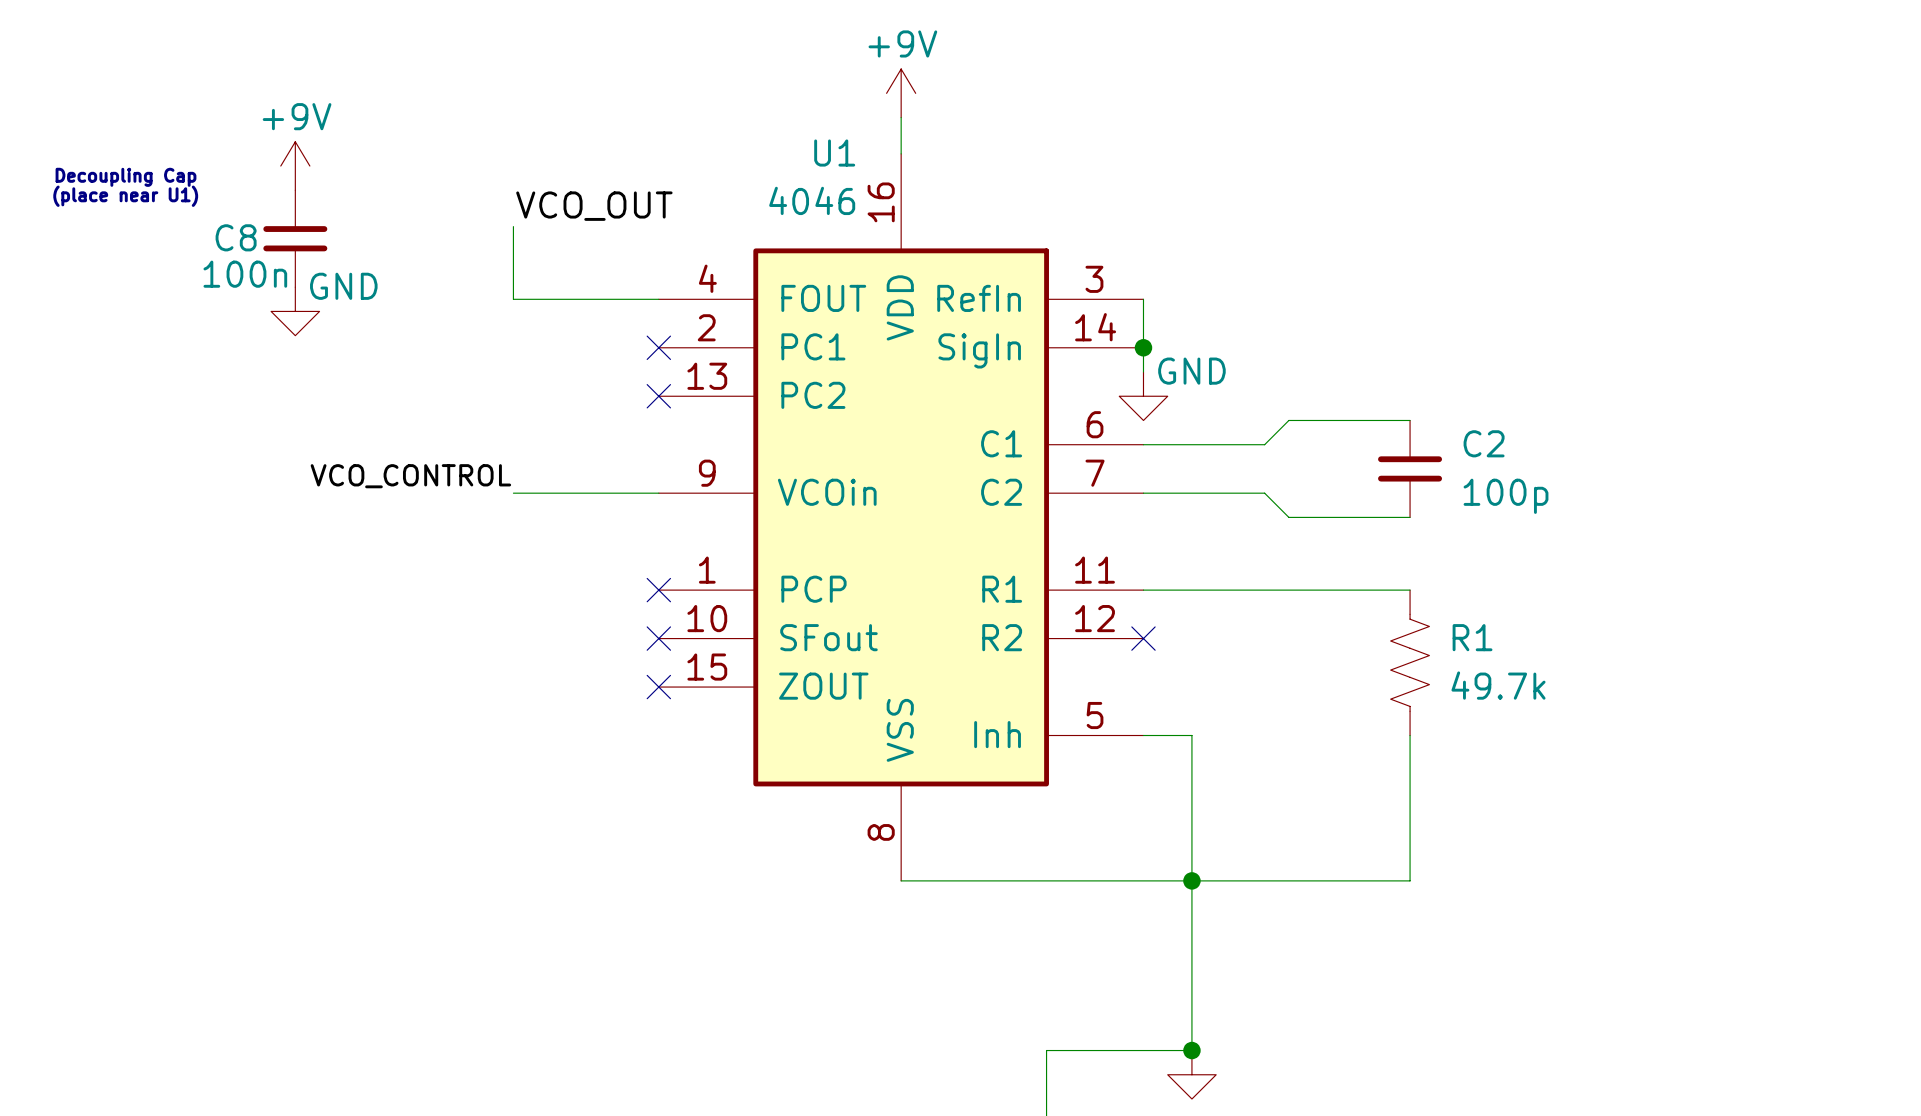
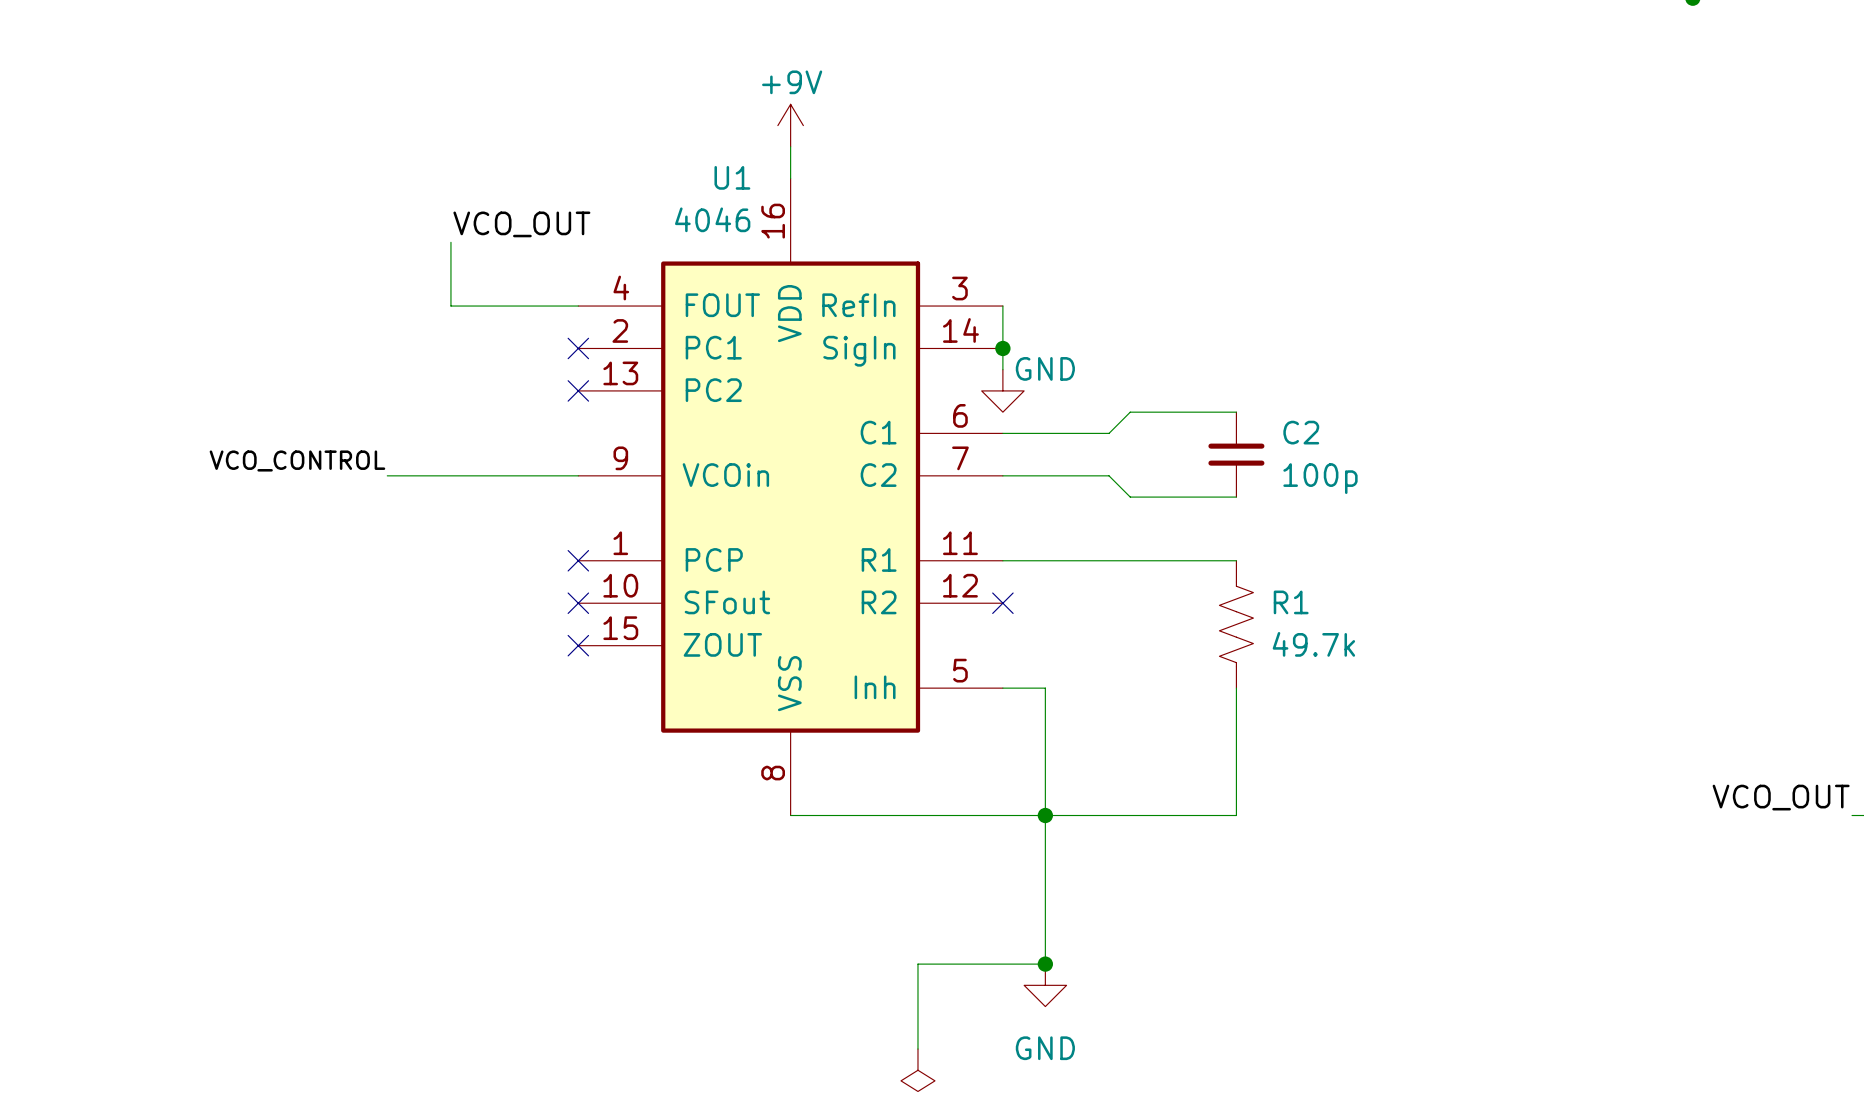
power symbol: +9V (295, 166) -> none
text: Decoupling Cap (125, 177) -> none
text: (place near U1) (125, 196) -> none
C8: 100n (295, 238) -> none
power symbol: GND (295, 311) -> none
label position: VCO_CONTROL (410, 476) -> VCO_CONTROL (297, 460)
wire: none -> (387, 475) (450, 475)

